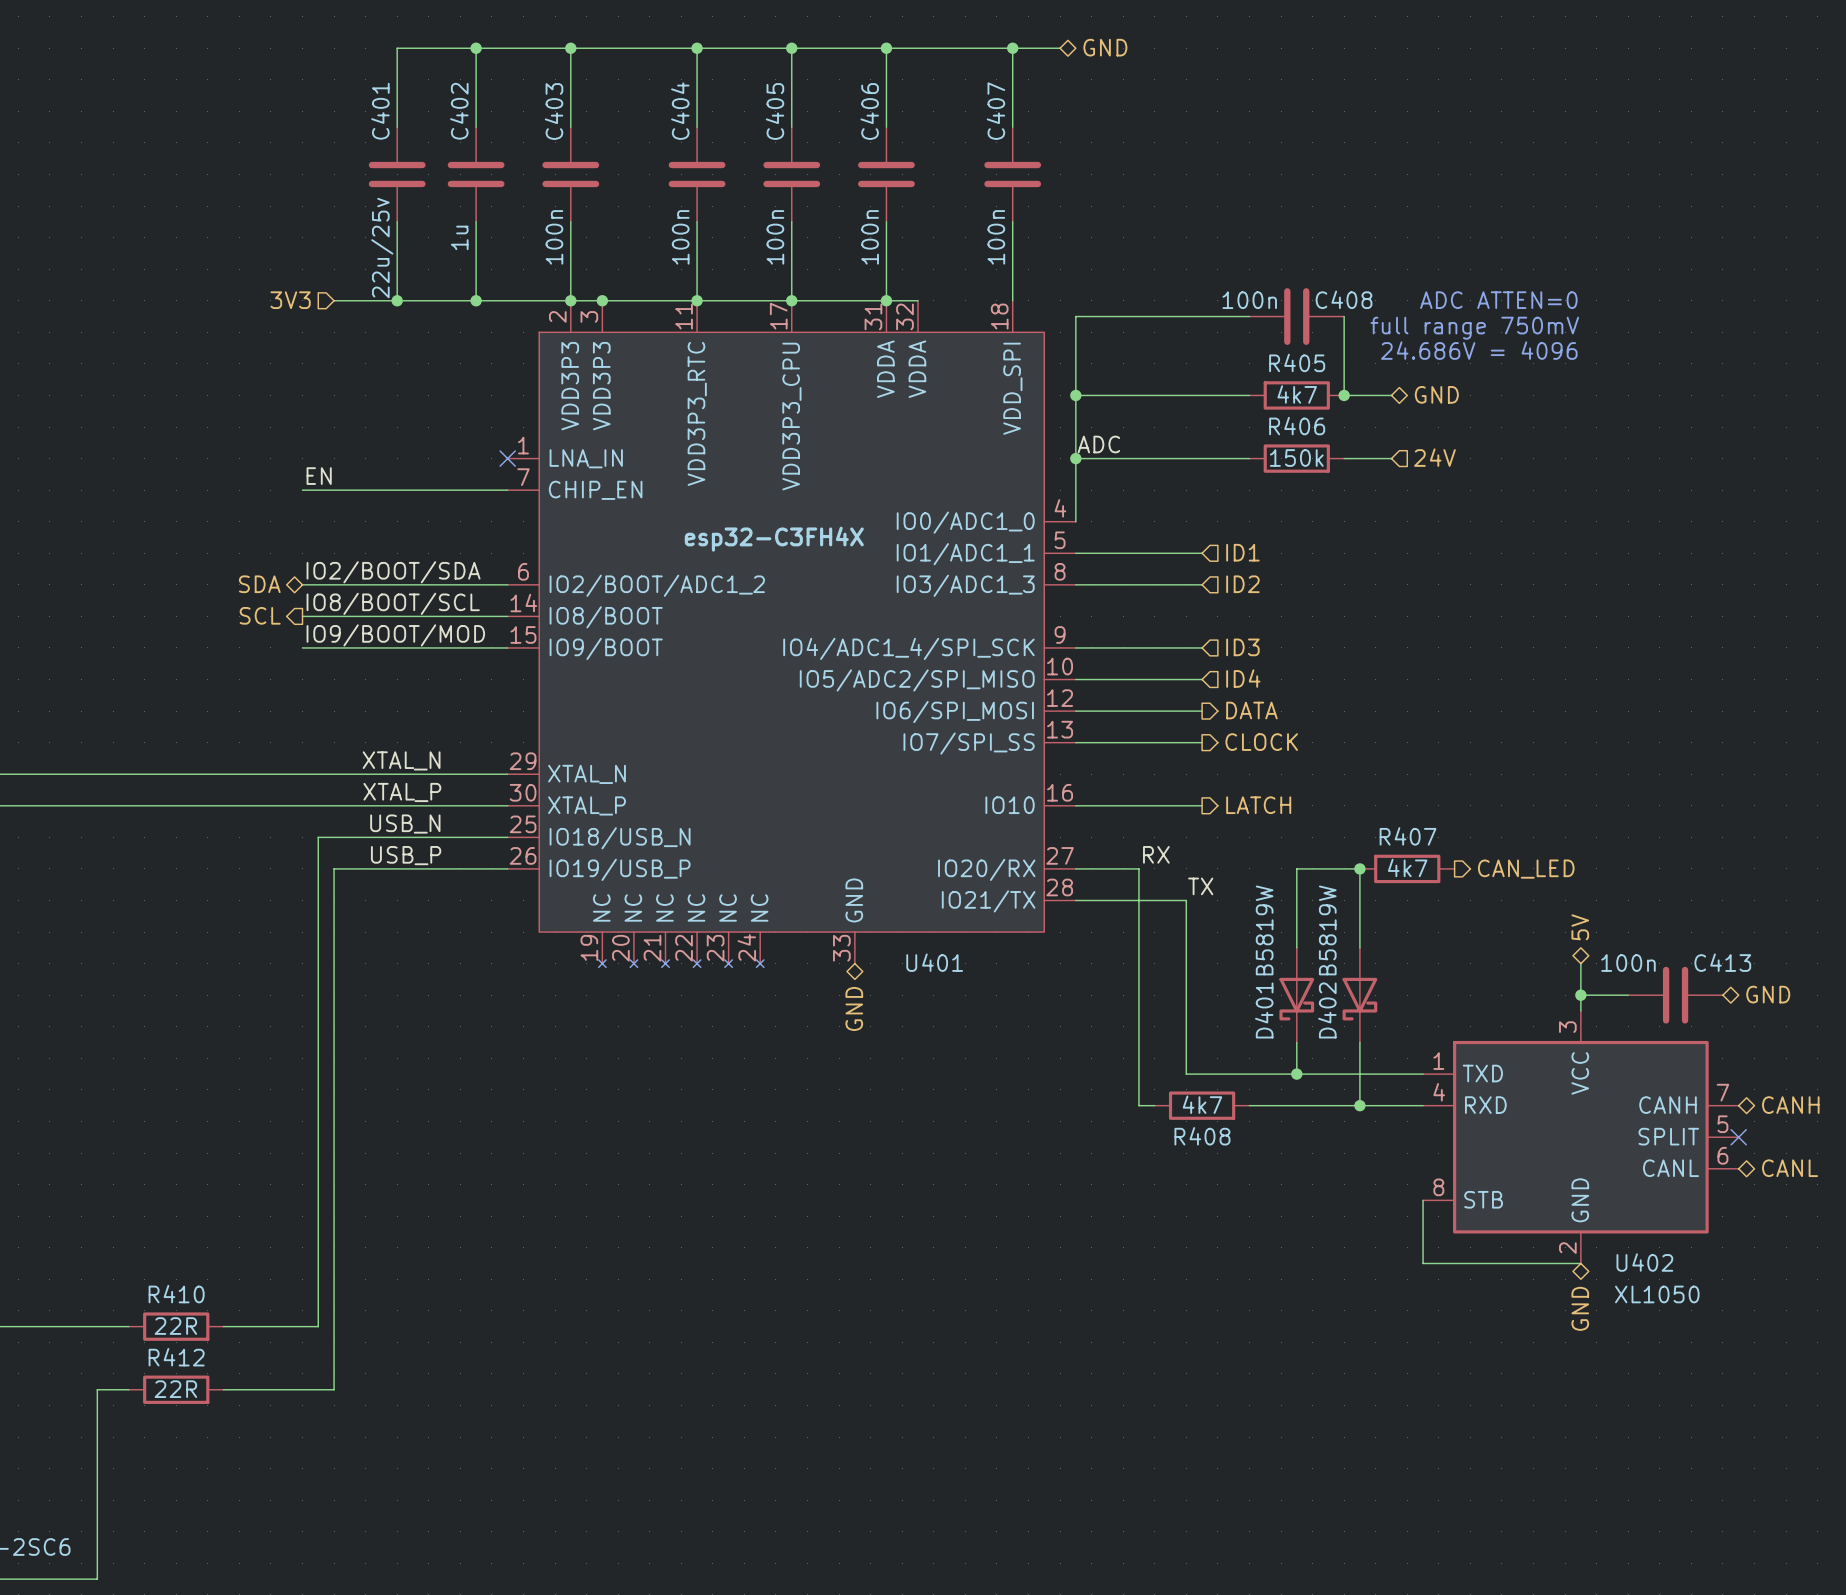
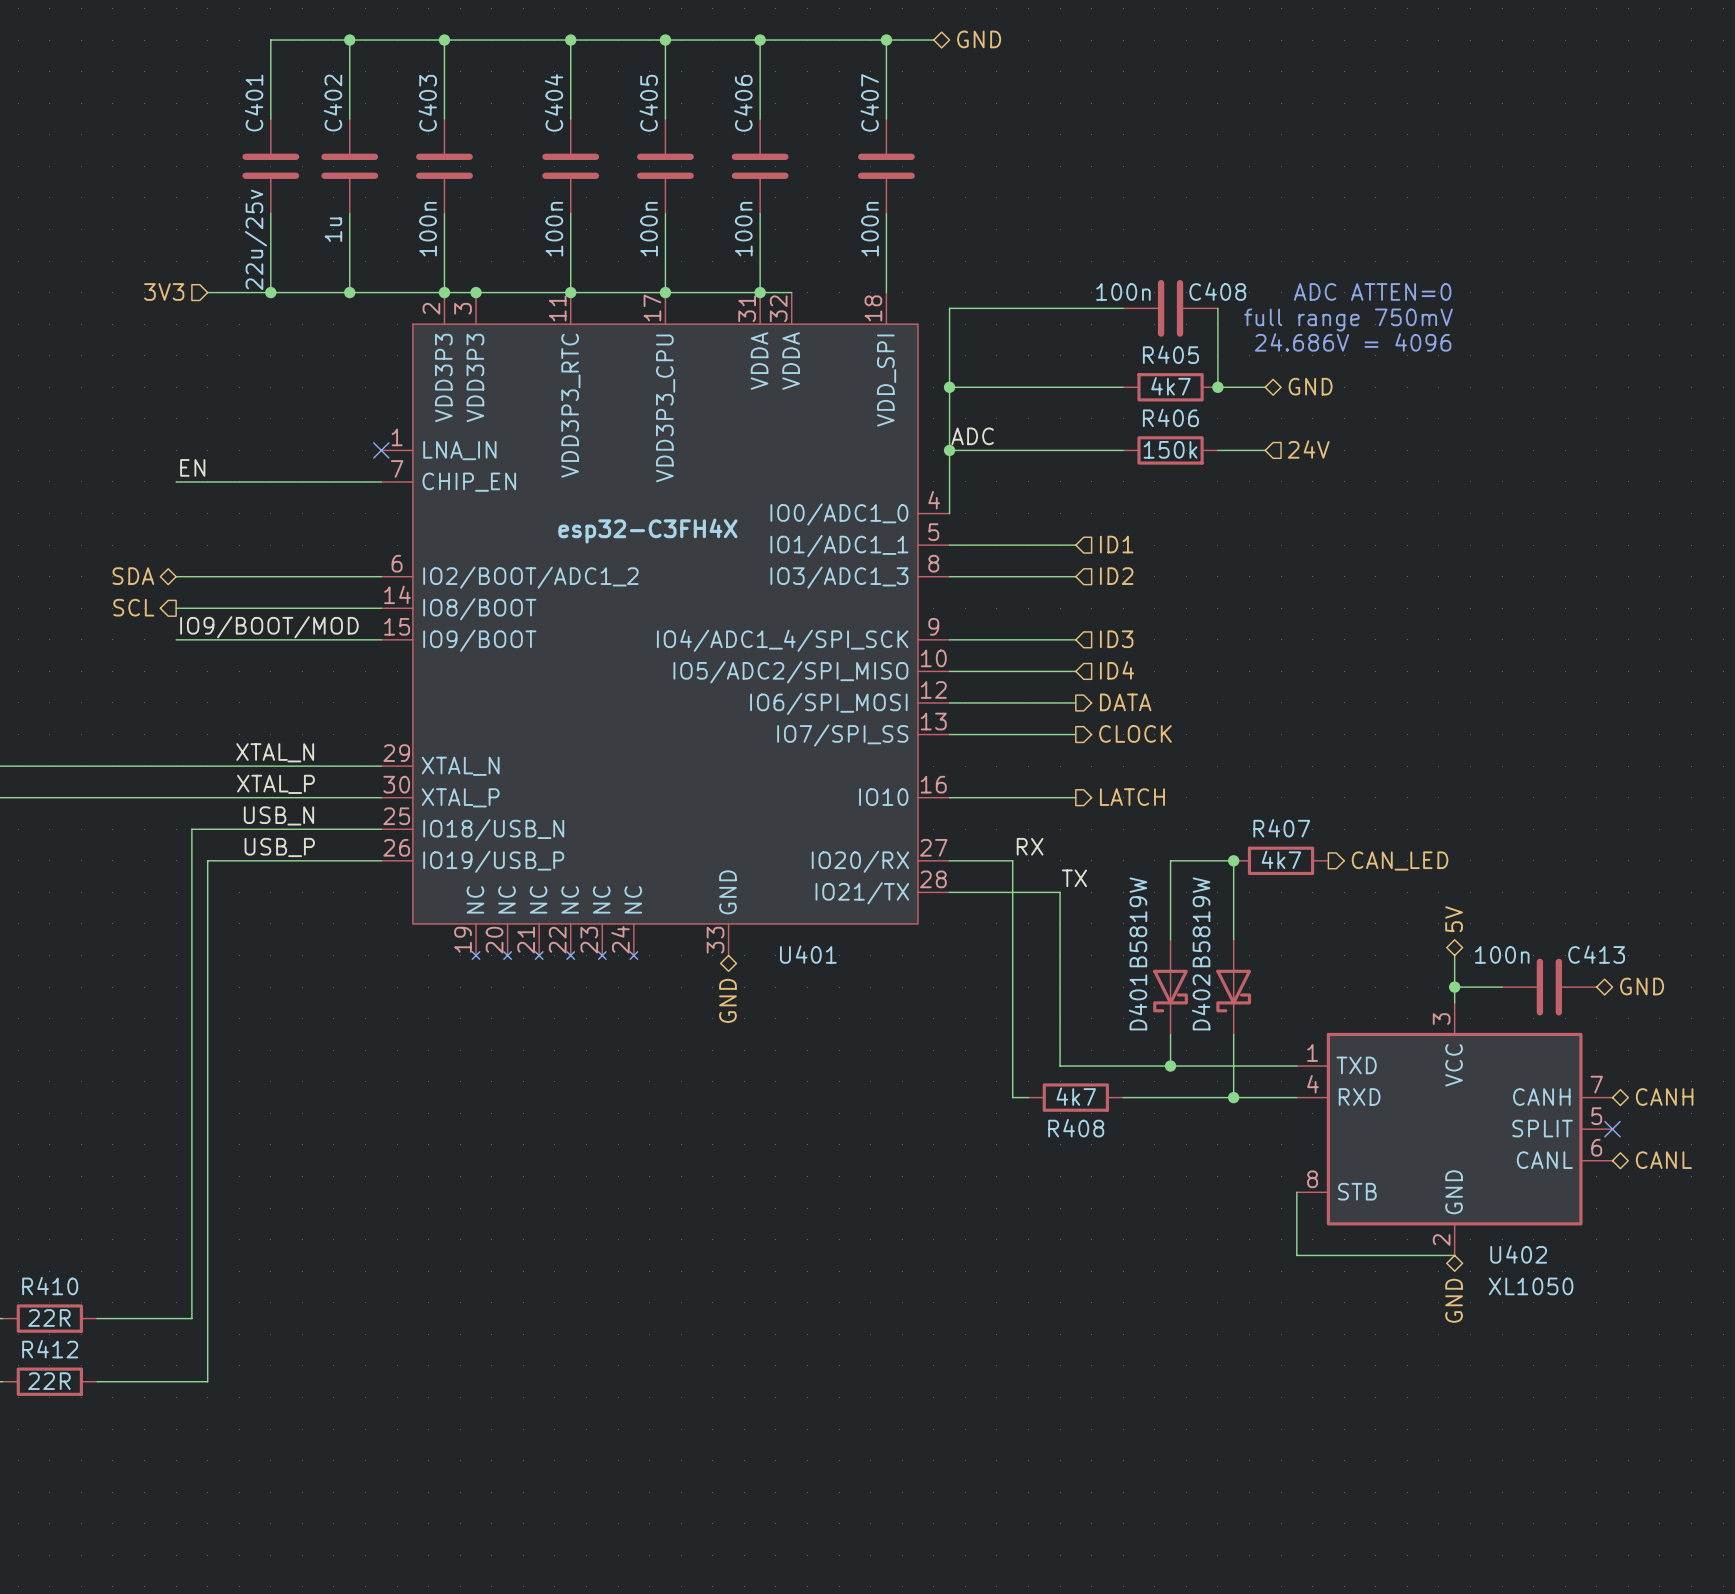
label: IO2/BOOT/SDA (393, 572) -> none
label: IO8/BOOT/SCL (393, 603) -> none

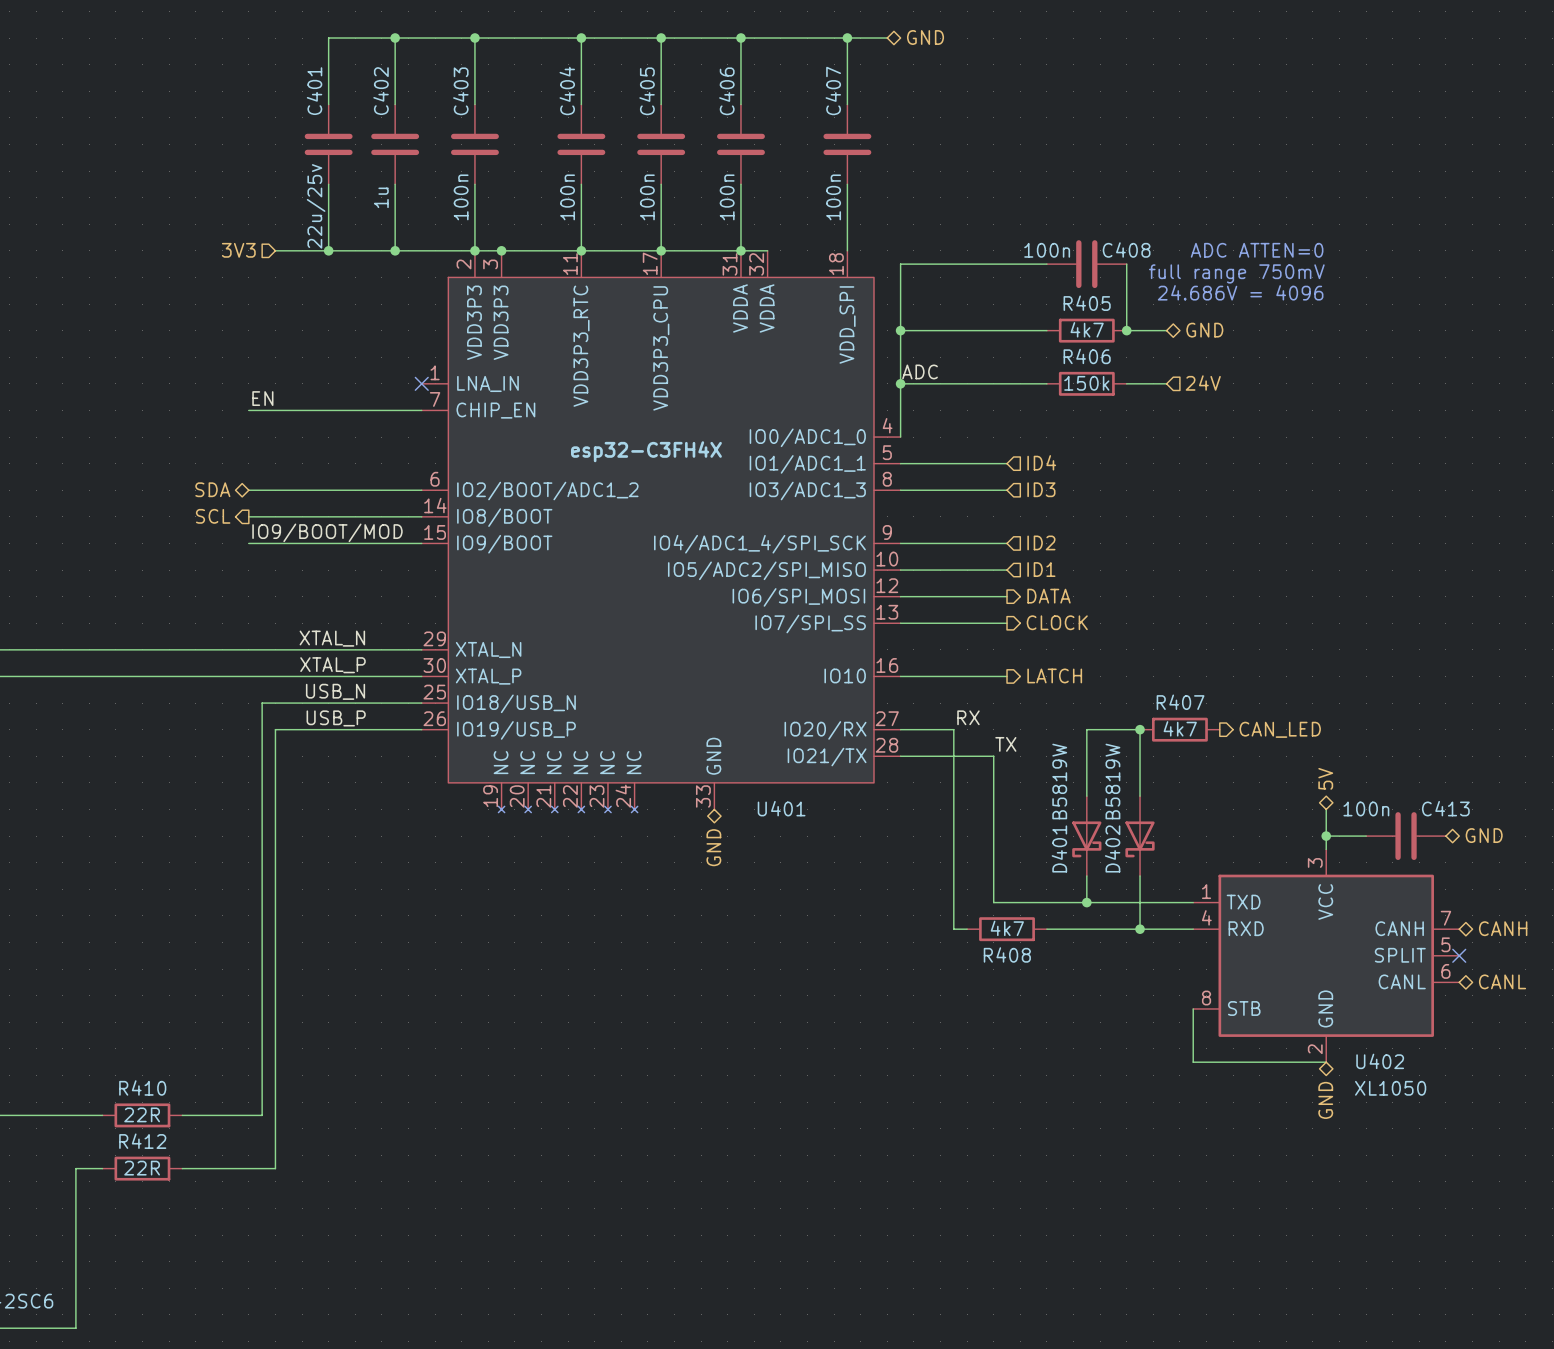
hierarchical label: ID1 (1116, 544) -> ID4 (1041, 462)
hierarchical label: ID2 (1116, 576) -> ID3 (1041, 489)
hierarchical label: ID3 (1116, 639) -> ID2 (1041, 542)
hierarchical label: ID4 (1117, 670) -> ID1 (1041, 569)

